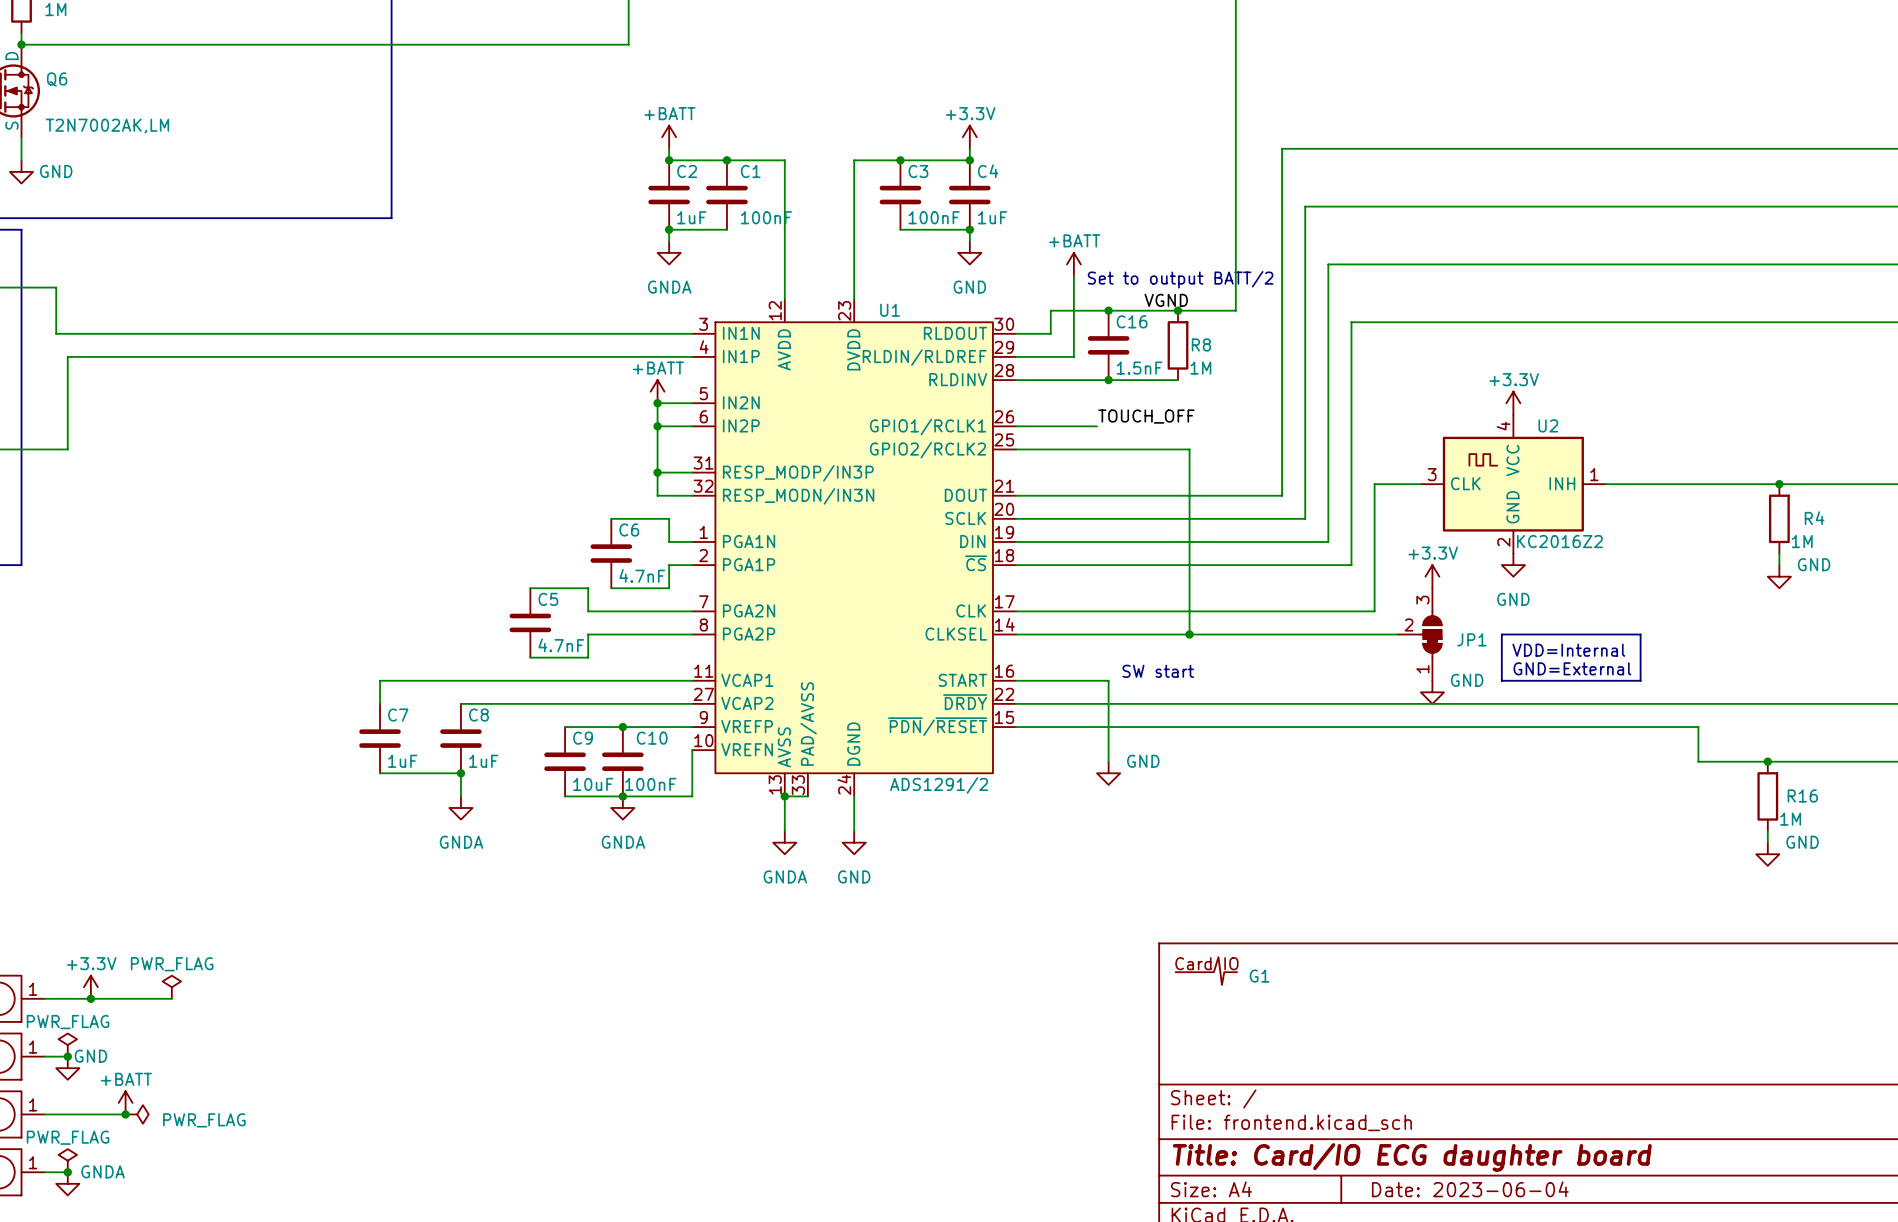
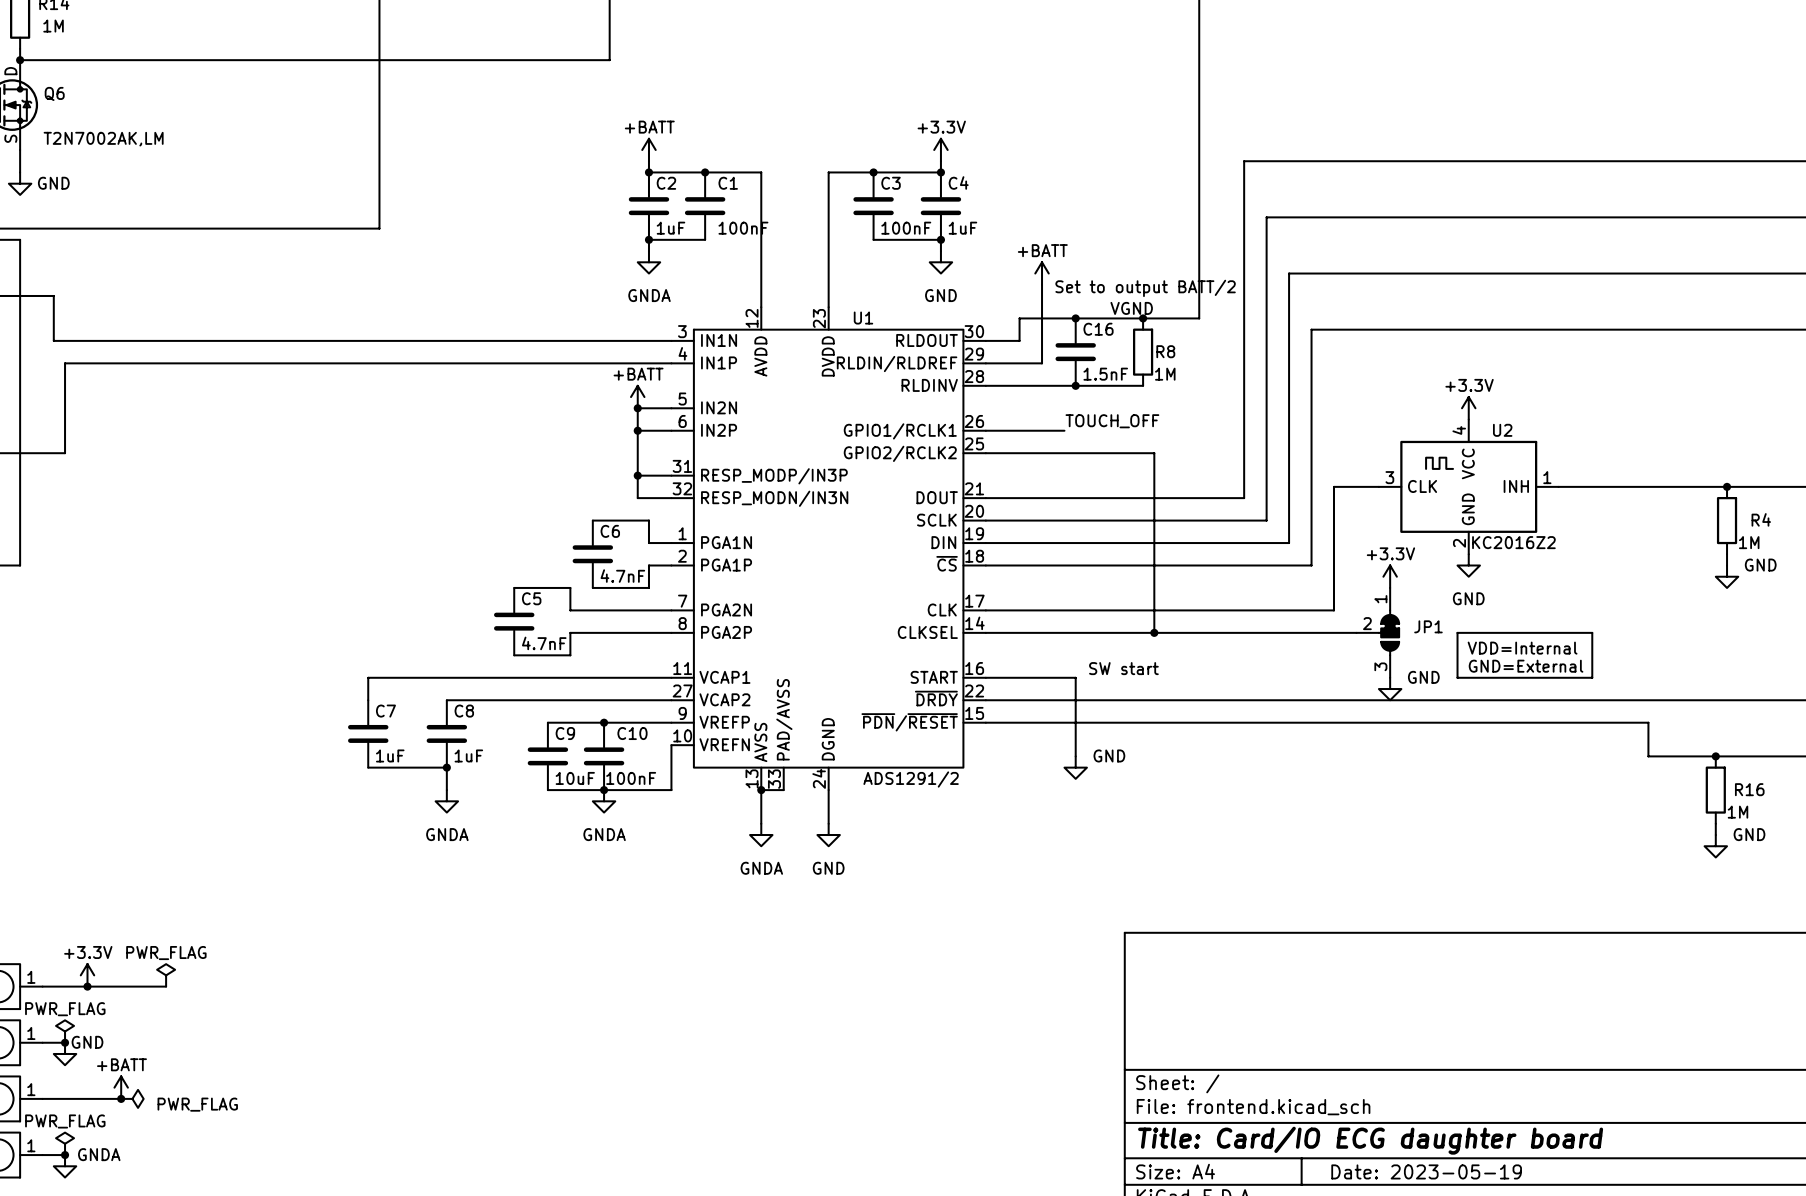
JP1 flip: as is (1431, 634) -> up-down (1389, 632)
G1: (1206, 971) -> none
title block: Date: 2023-06-04 (1470, 1189) -> Date: 2023-05-19 (1426, 1171)

